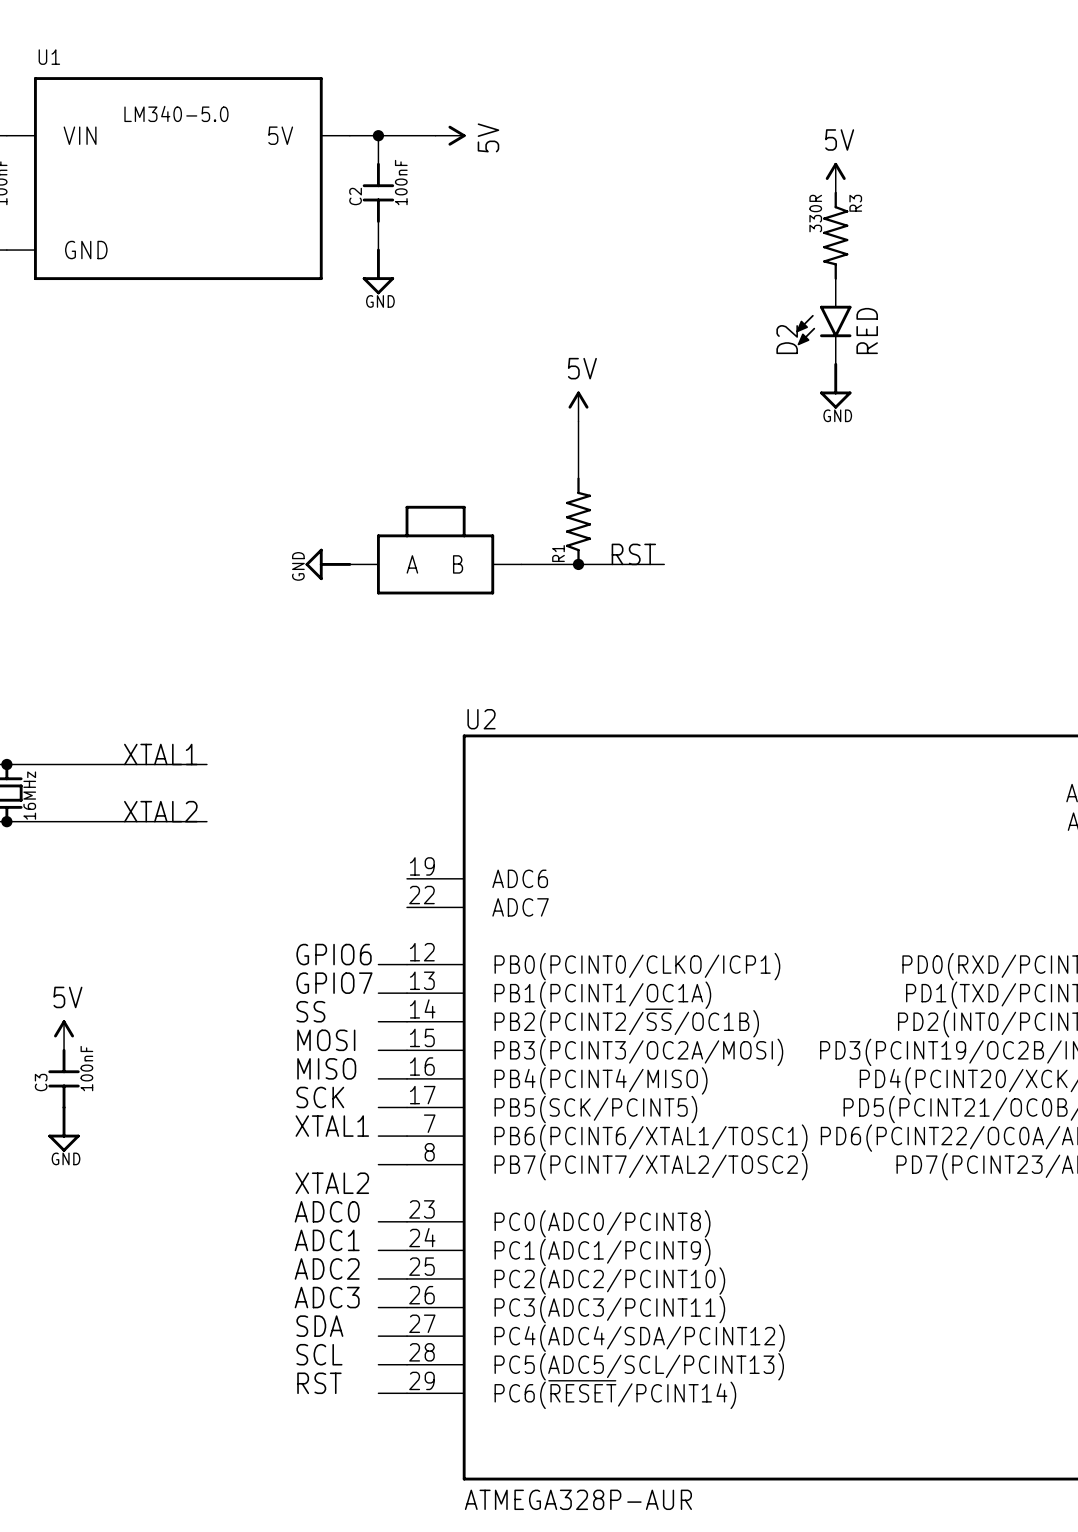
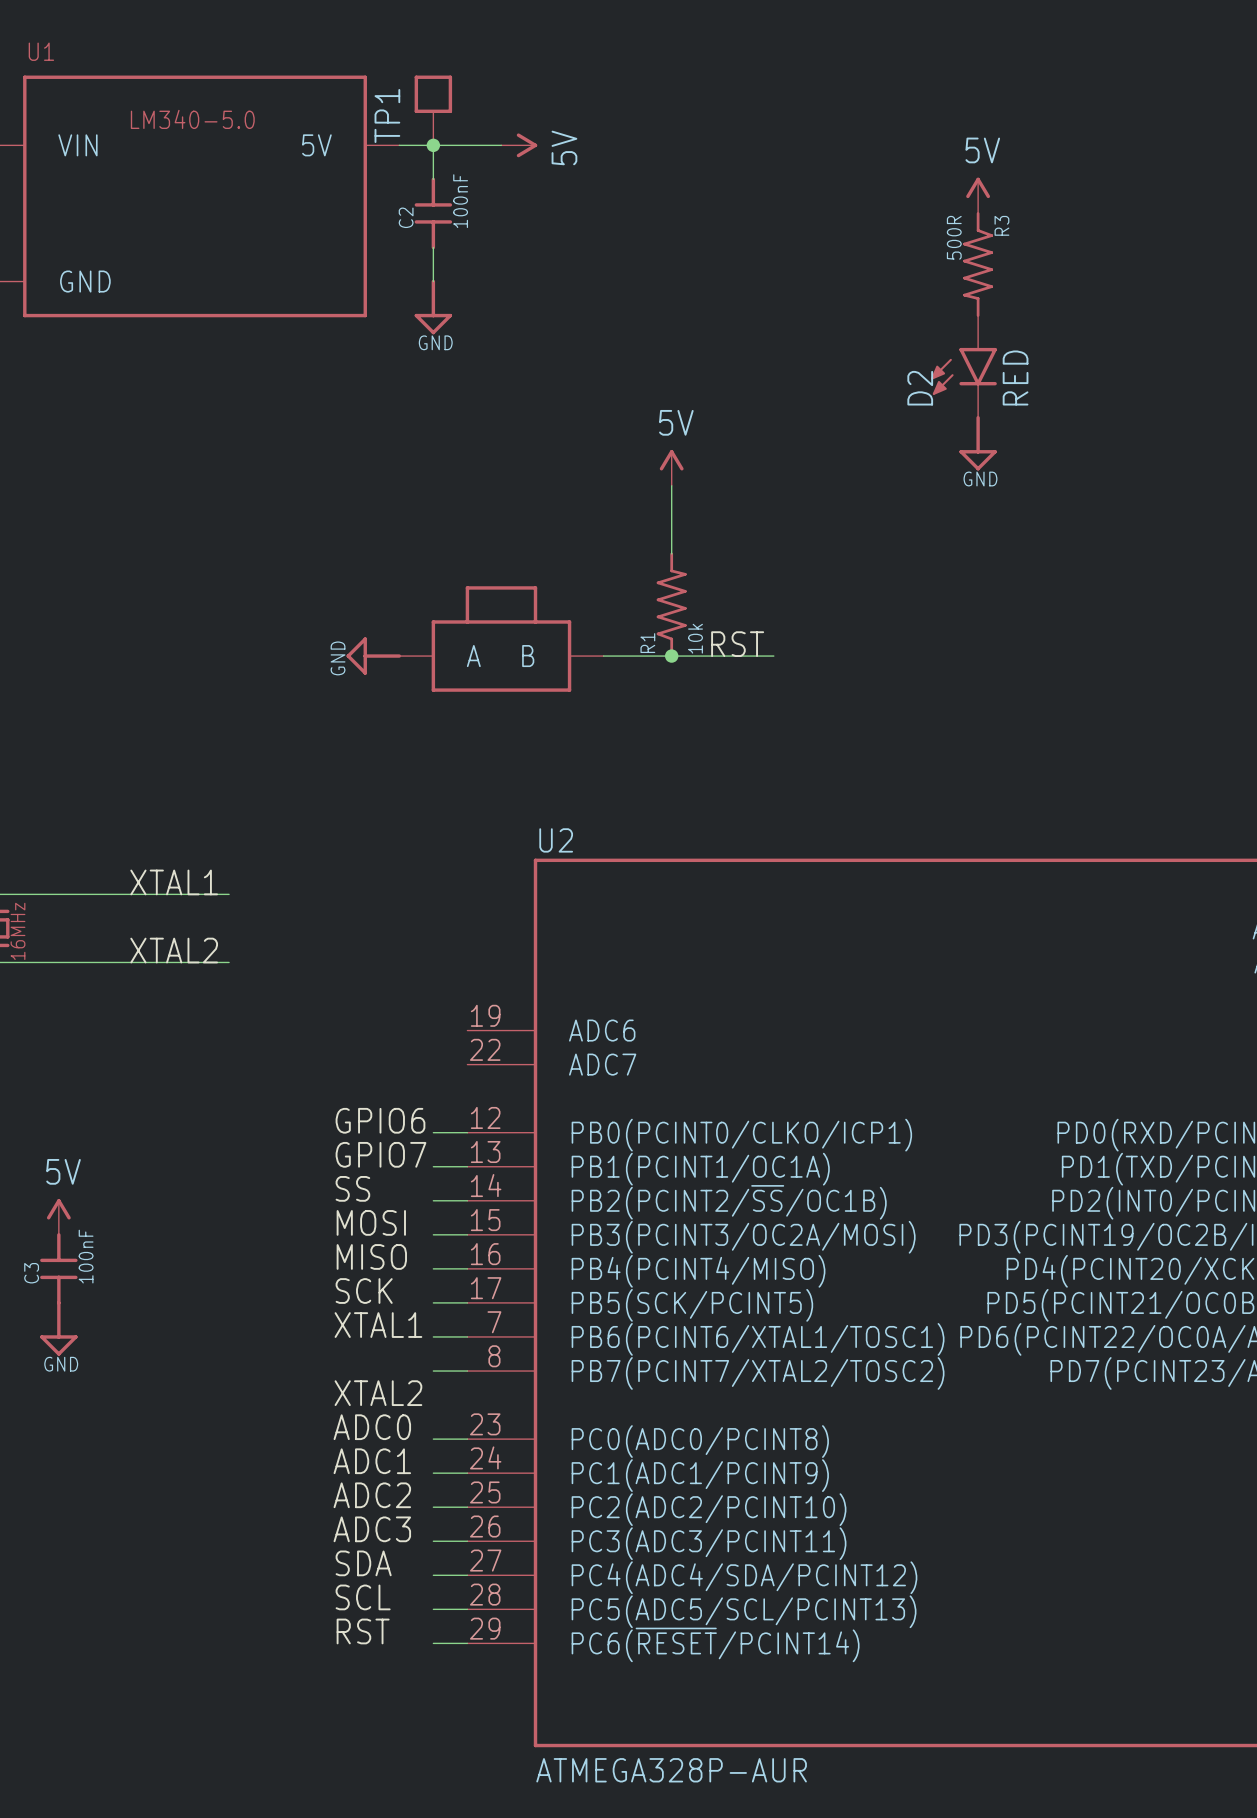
TP1: none -> (433, 110)
R3 value: 330R (815, 213) -> 500R (954, 237)
R1 value: none -> 10k (695, 638)

